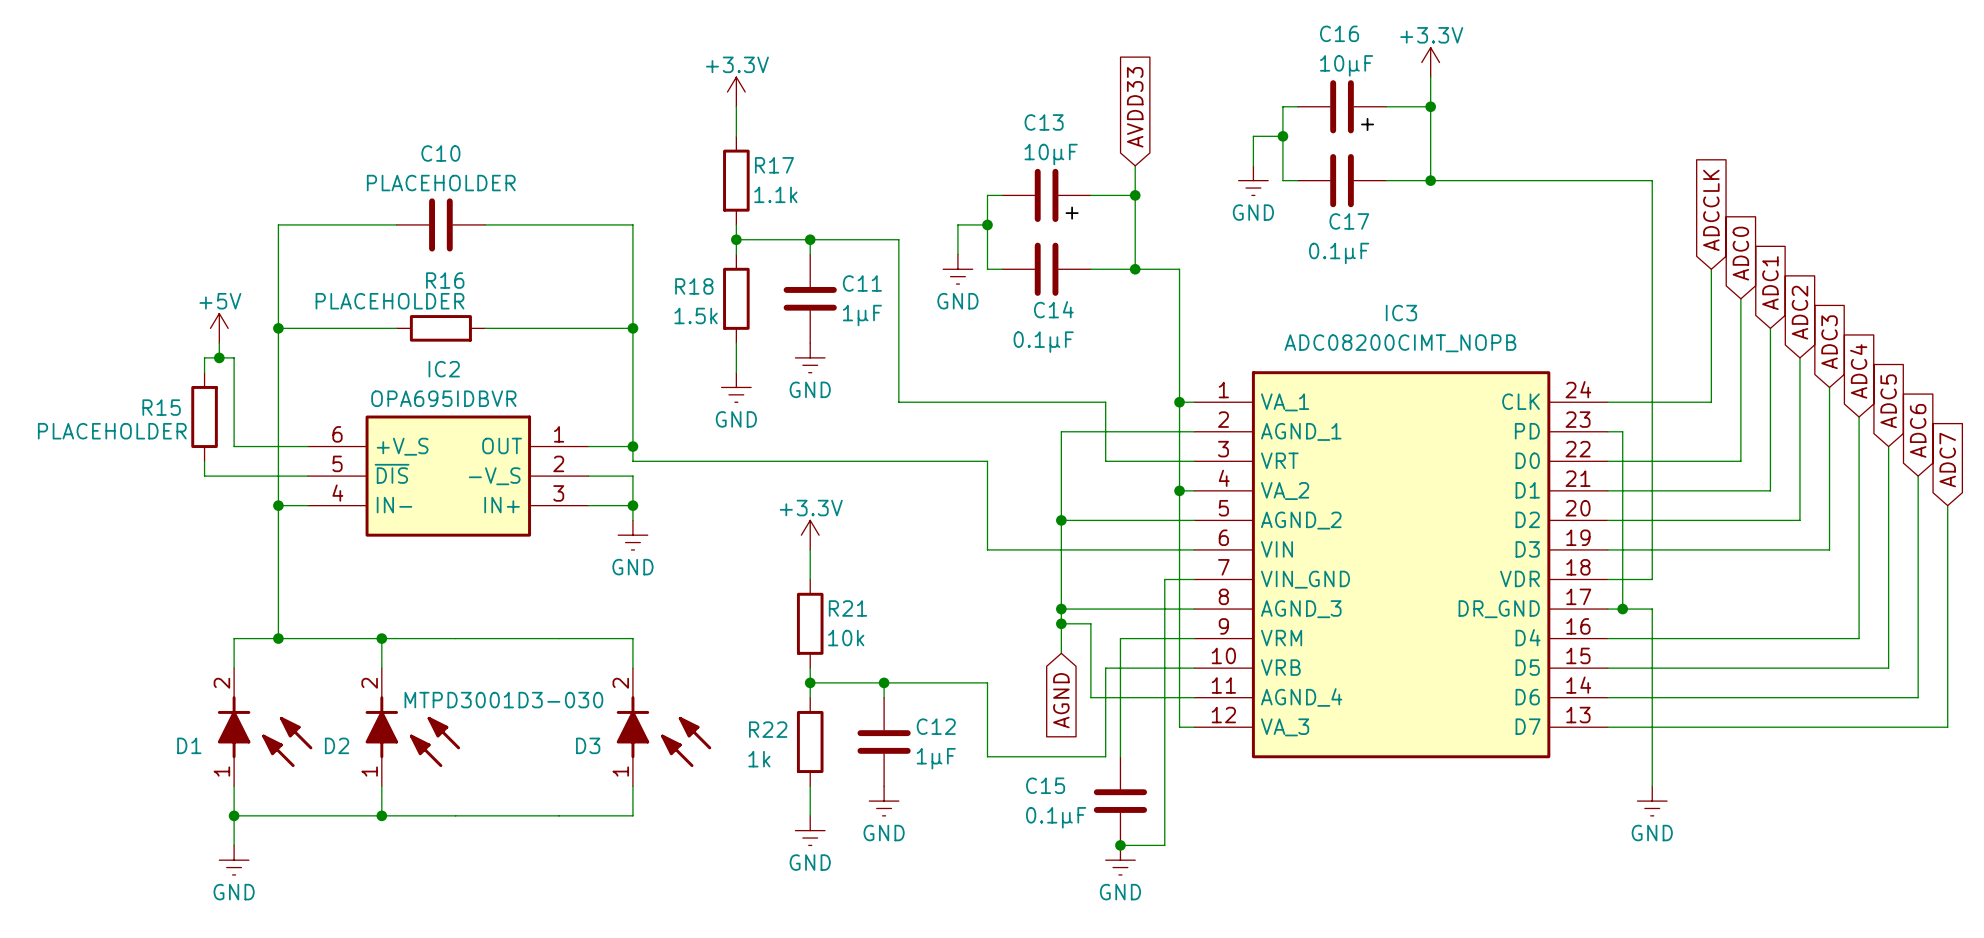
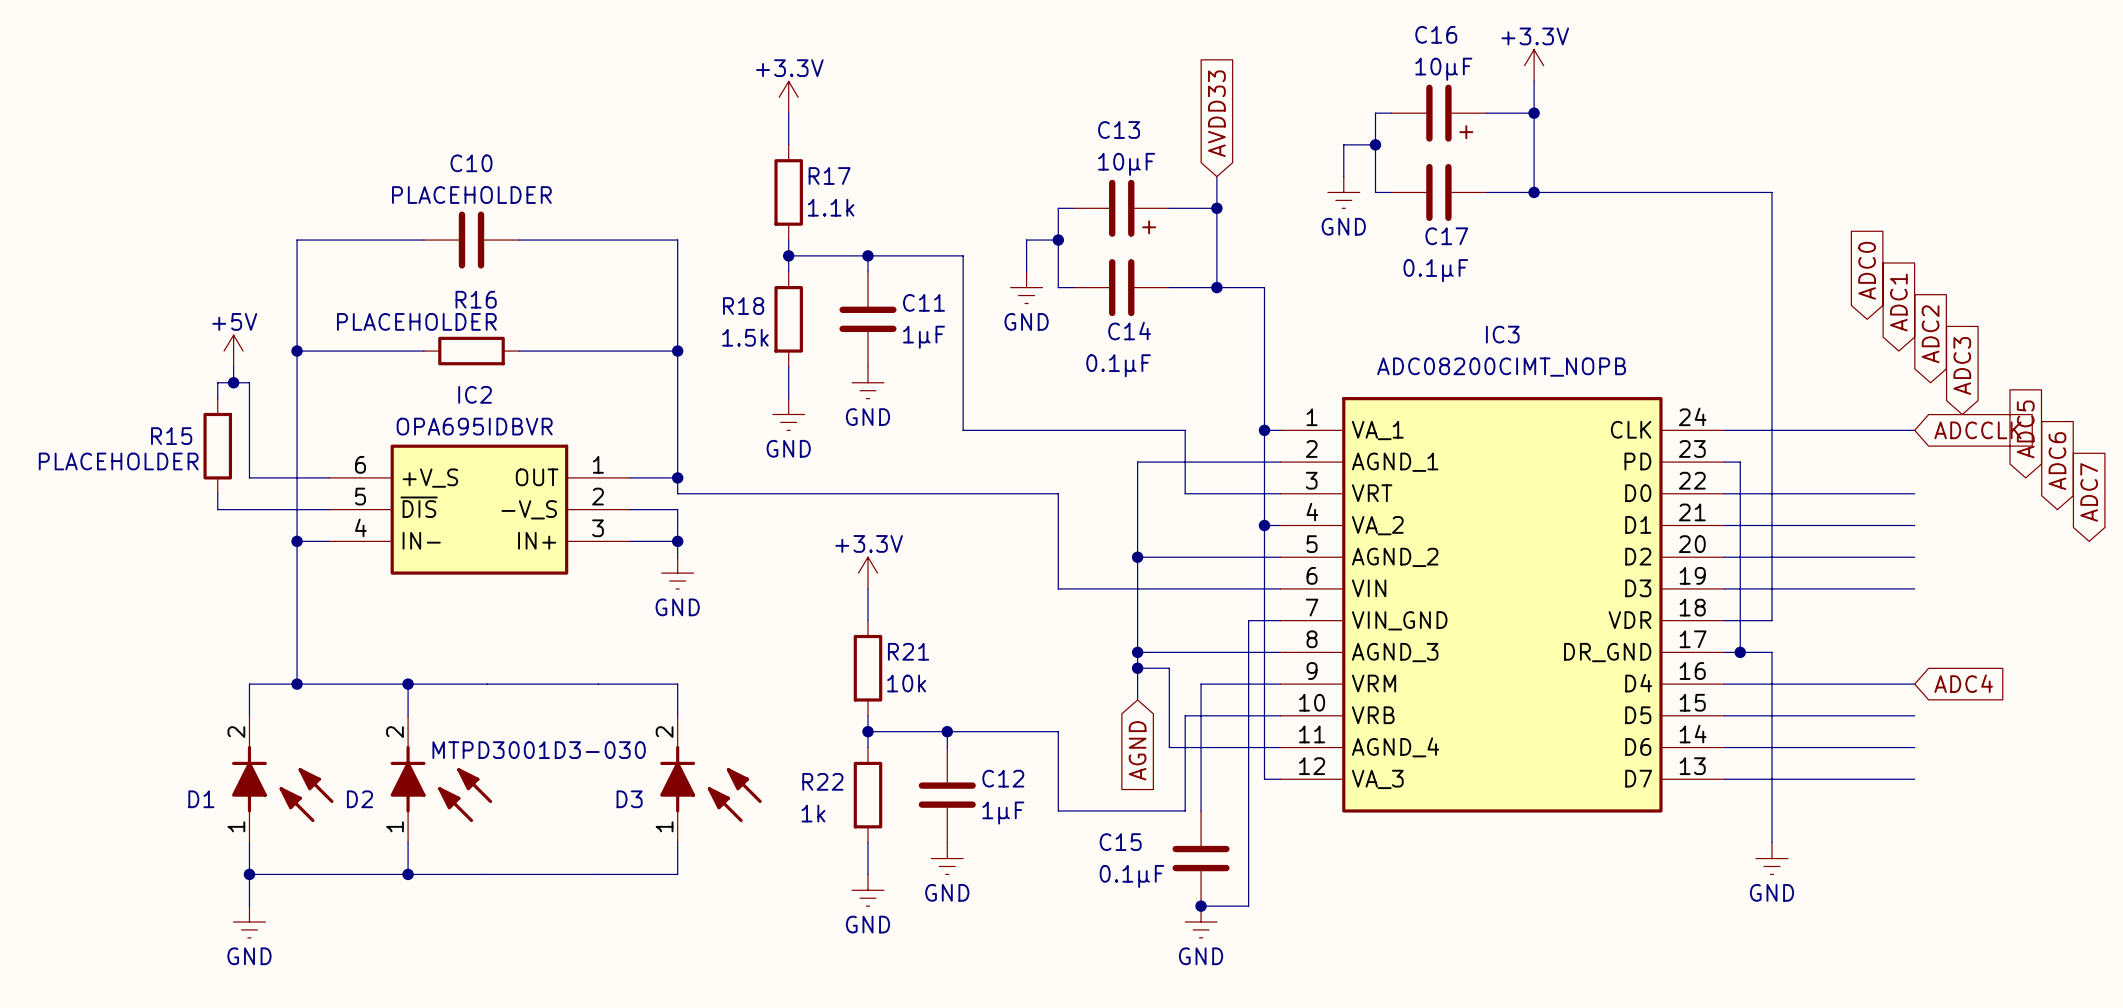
global label rotation: 0° (1711, 210) -> 90° clockwise (1978, 430)
global label position: ADCCLK (1711, 210) -> ADCCLK (1978, 430)
wire: (1711, 269) (1711, 402) -> (1914, 430) (1835, 430)
wire: (1740, 298) (1740, 461) -> (1914, 493) (1867, 493)
wire: (1770, 328) (1770, 490) -> (1914, 525) (1898, 525)
wire: (1799, 357) (1799, 520) (1785, 520) -> none
global label rotation: 0° (1858, 371) -> 90° clockwise (1963, 683)
global label position: ADC4 (1858, 371) -> ADC4 (1963, 683)
wire: (1829, 387) (1829, 549) (1785, 549) -> none
wire: (1859, 417) (1859, 638) (1785, 638) -> none
wire: (1888, 446) (1888, 668) (1785, 668) -> none
wire: (1918, 476) (1918, 697) (1785, 697) -> none
wire: (1947, 505) (1947, 727) (1785, 727) -> none

